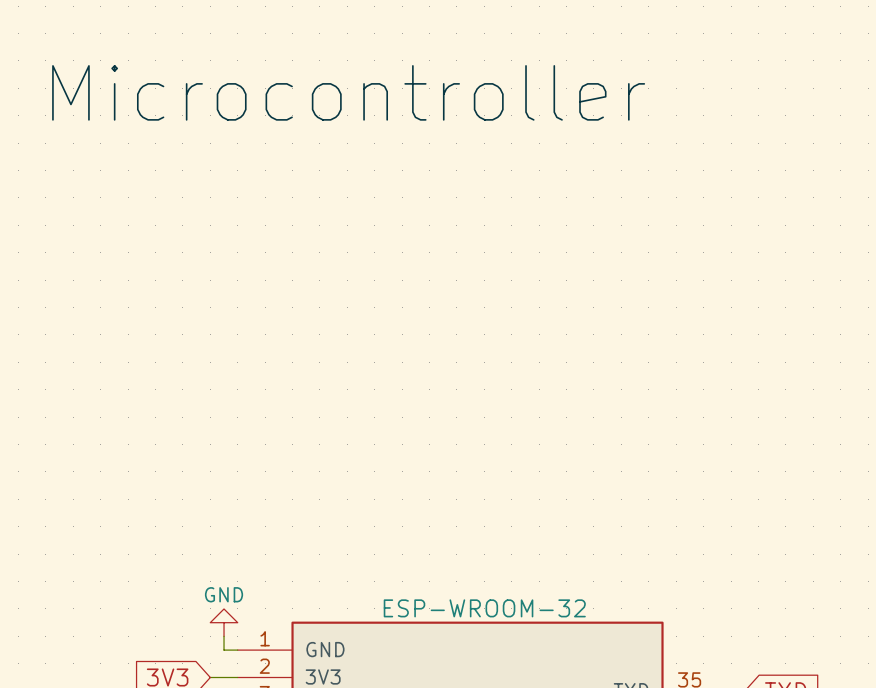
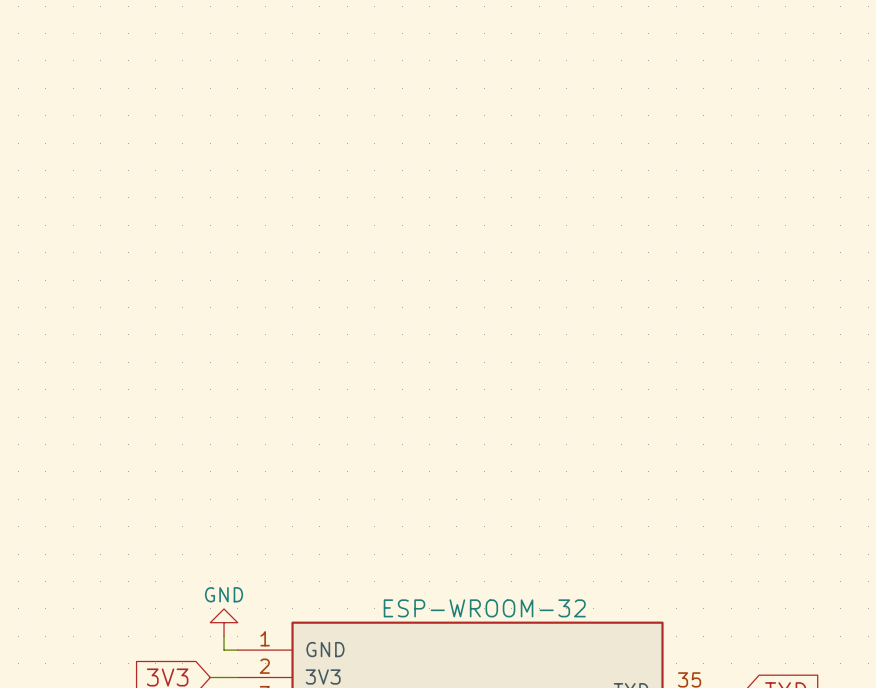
label: Microcontroller (348, 92) -> none

